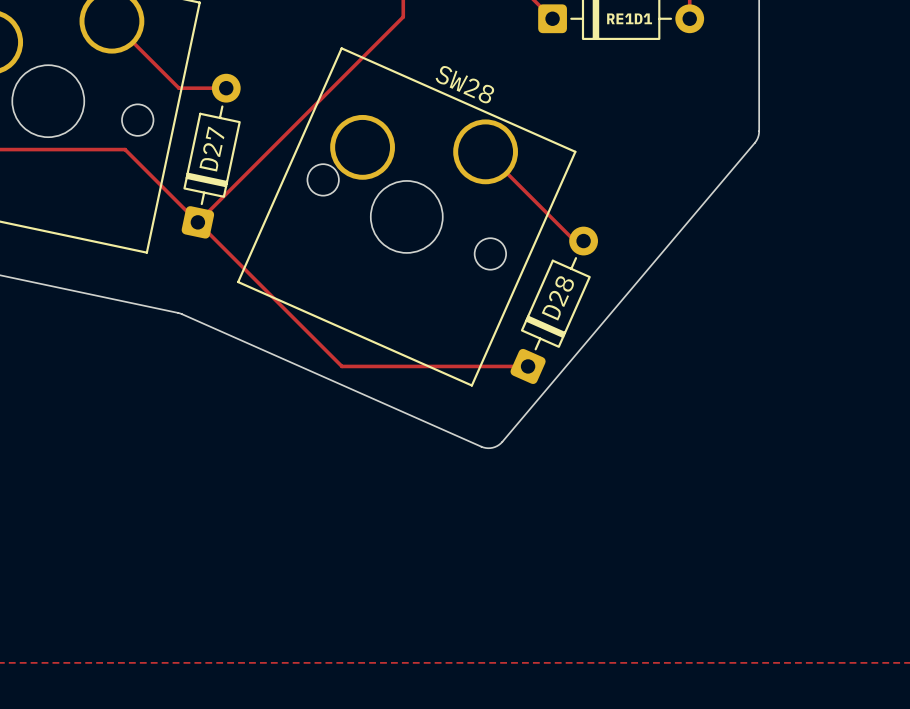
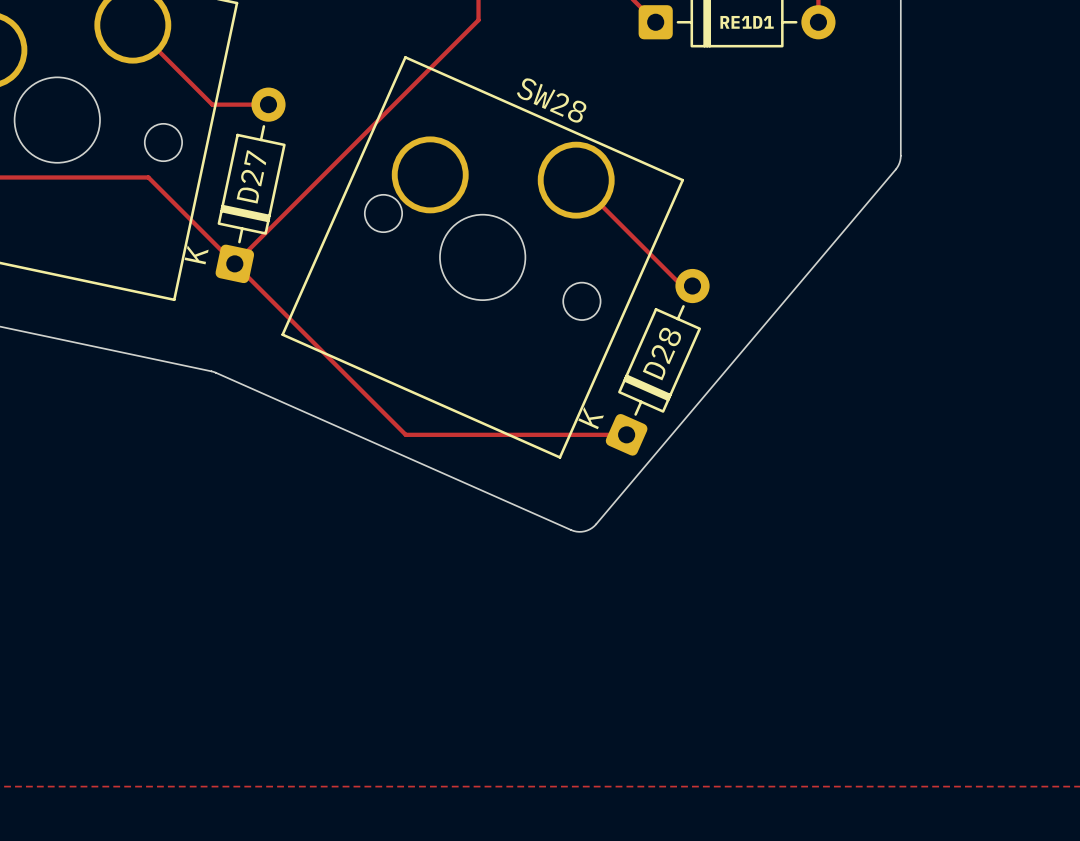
D27 text: none -> K (196, 254)
D28 text: none -> K (591, 418)

